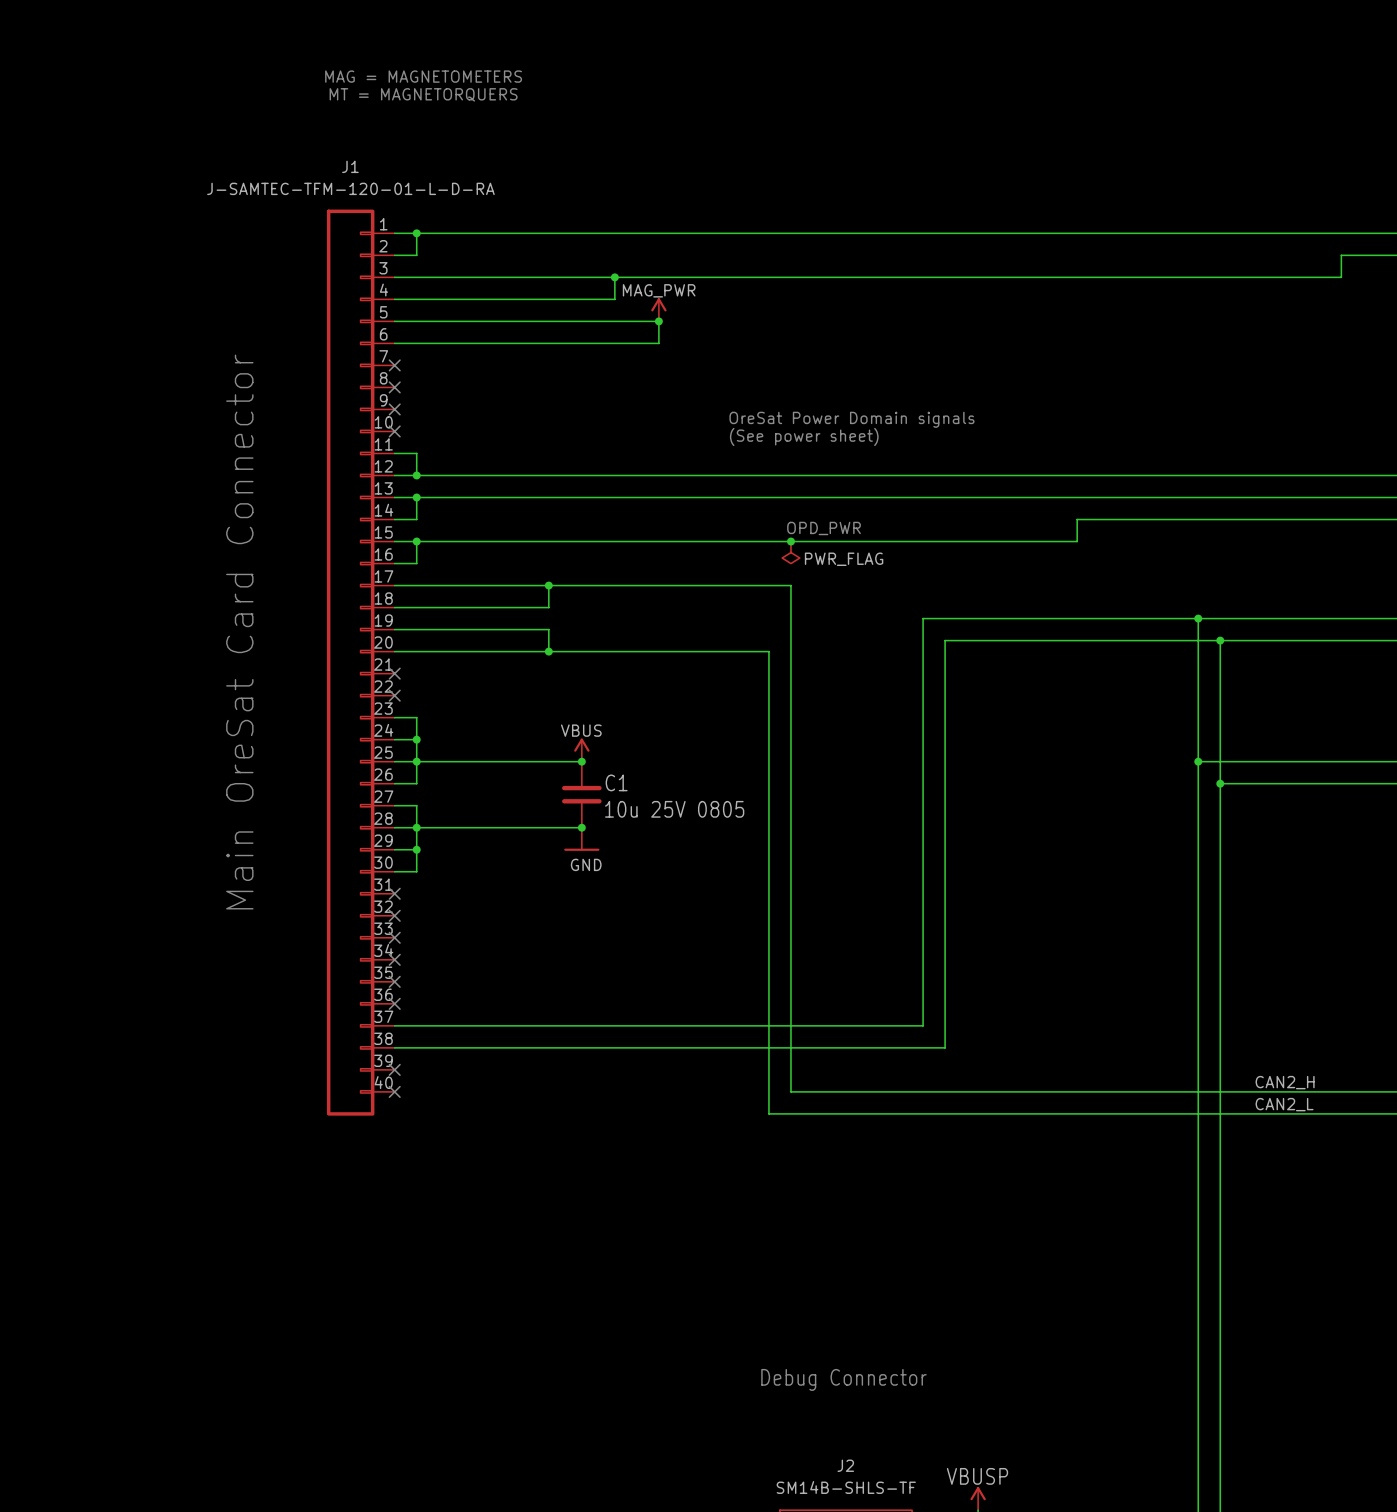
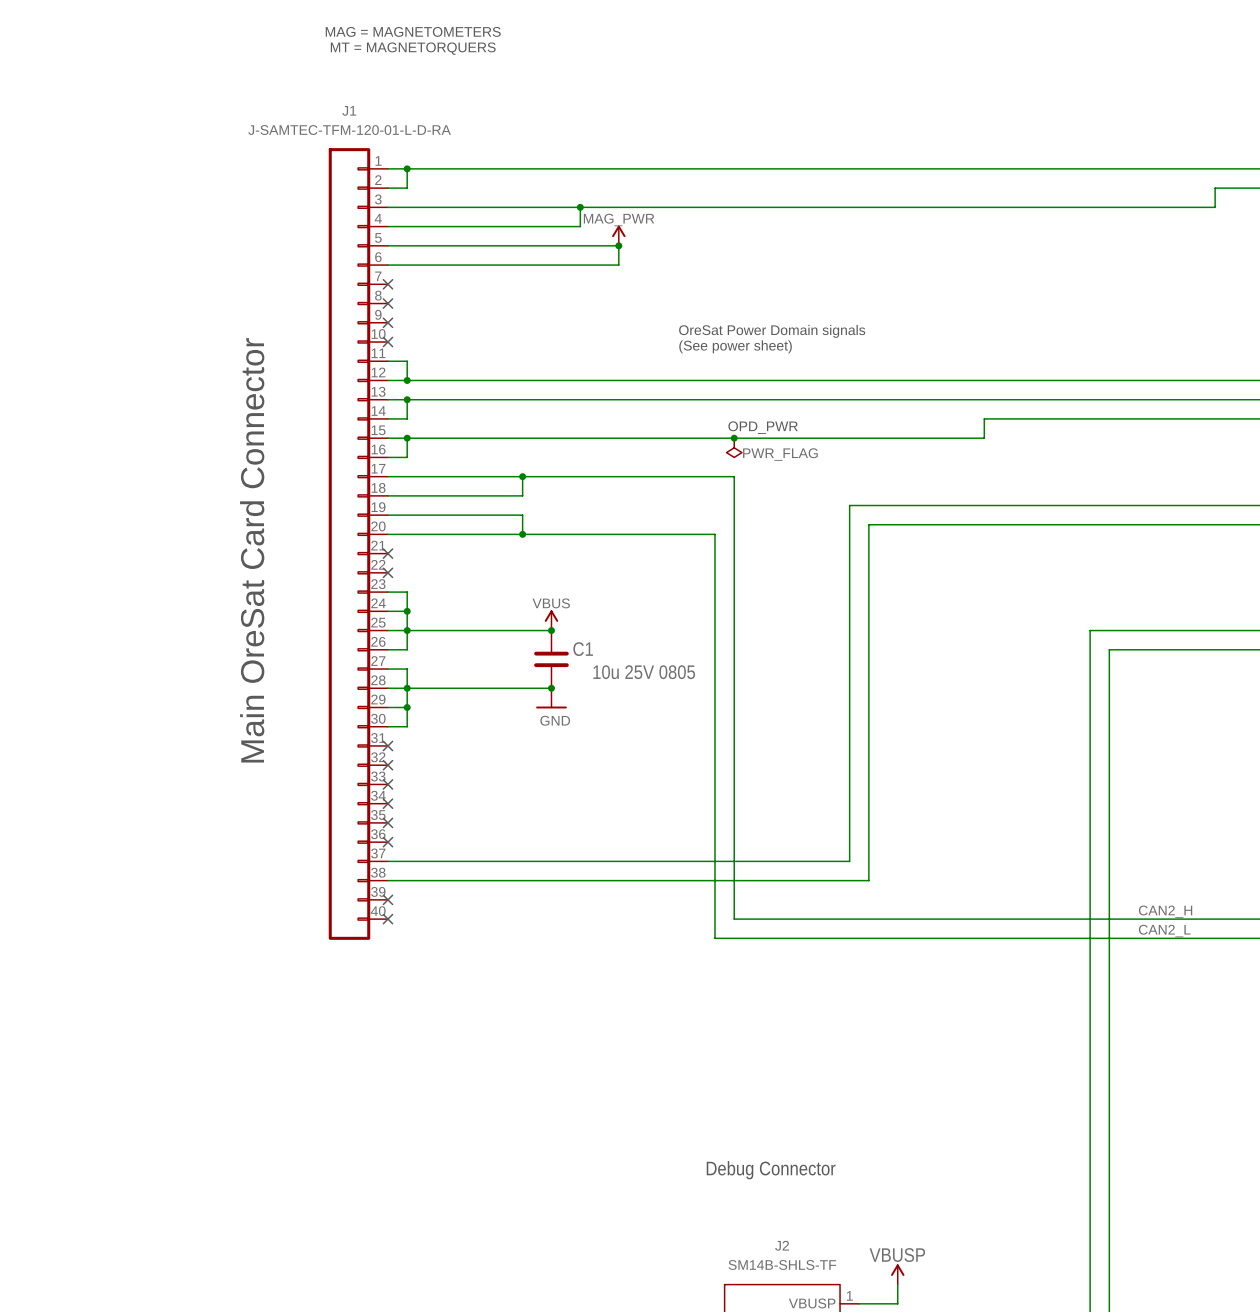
wire: (1198, 618) (1198, 761) -> none
junction: (1198, 618) -> none
wire: (1220, 640) (1220, 783) -> none
junction: (1220, 640) -> none
junction: (1198, 761) -> none
junction: (1220, 783) -> none

